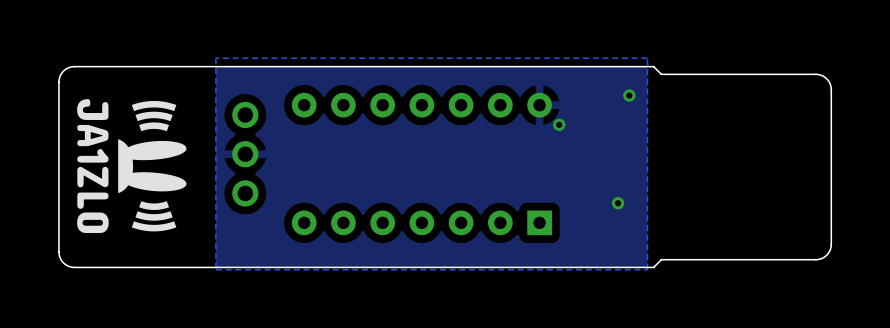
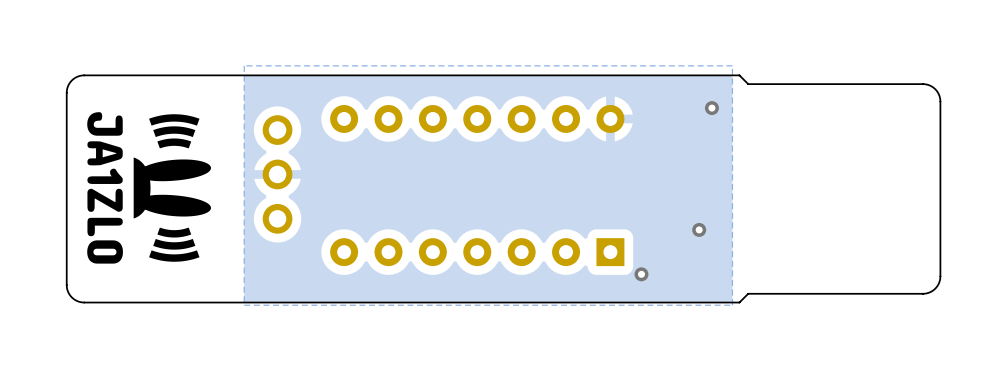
via: (559, 124) -> none
via: none -> (641, 274)

